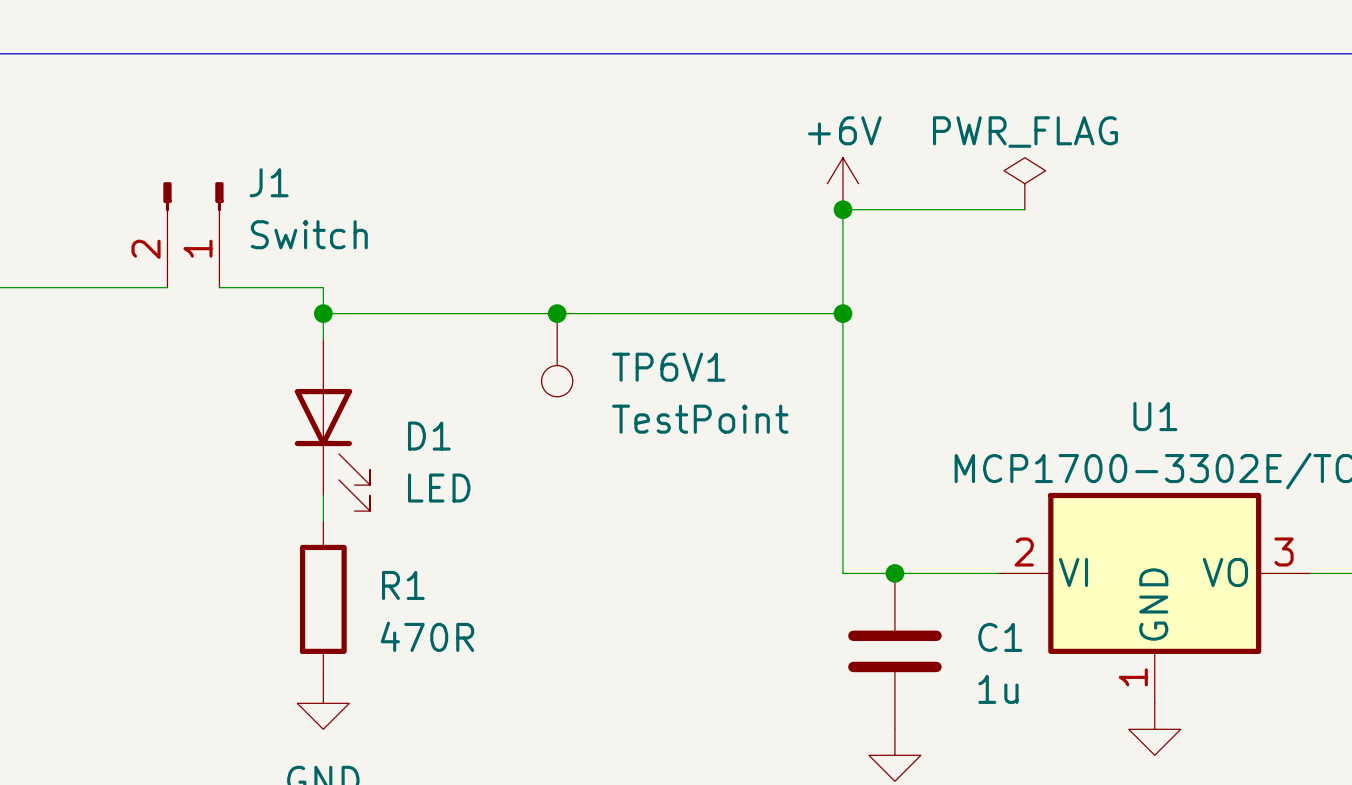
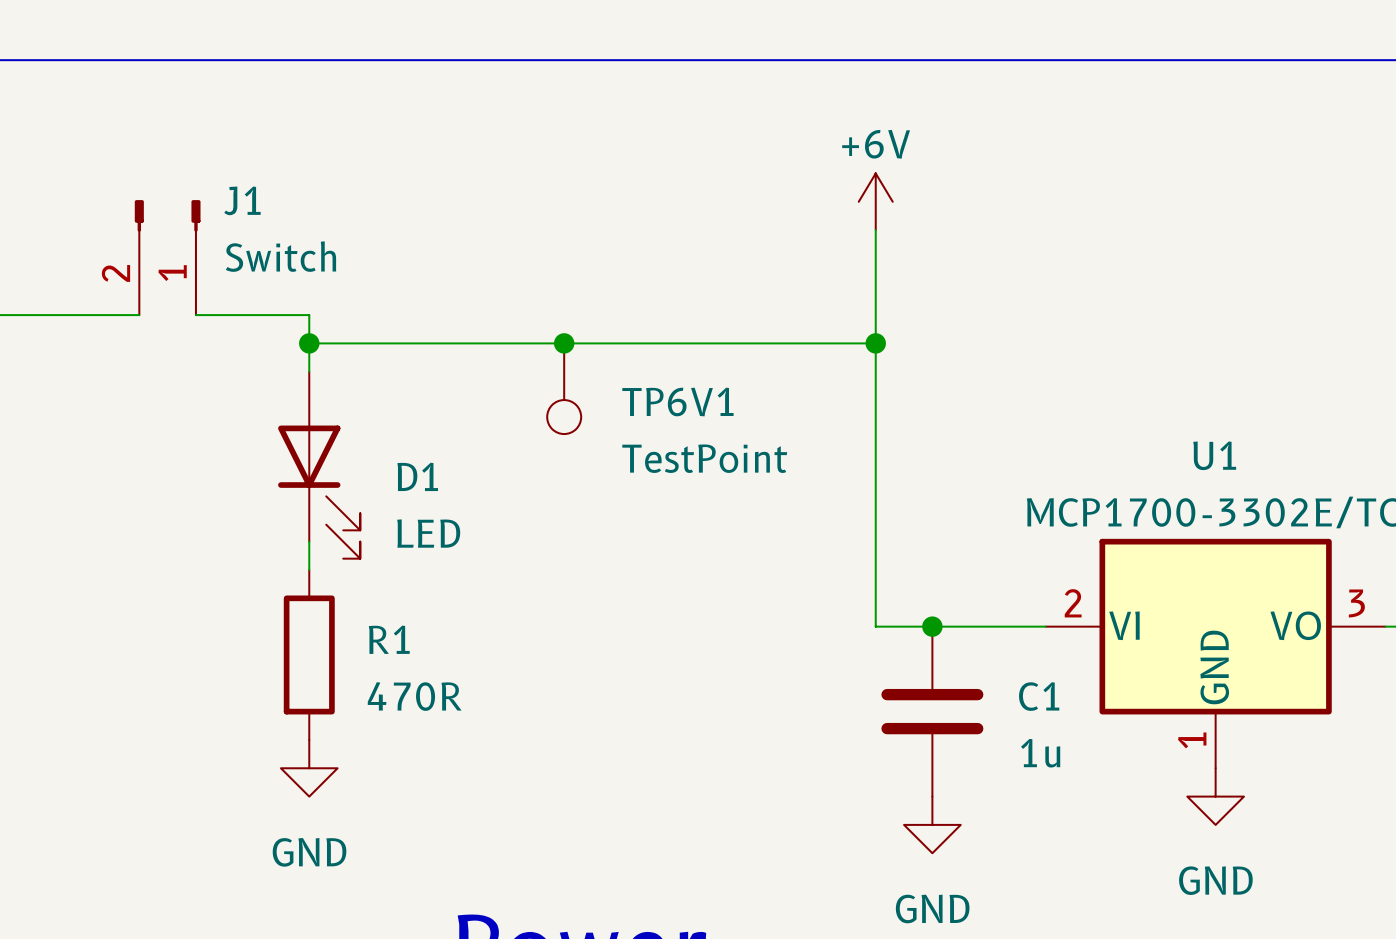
power symbol: PWR_FLAG (1024, 183) -> none
wire: (842, 209) (1024, 209) -> none
junction: (842, 209) -> none

